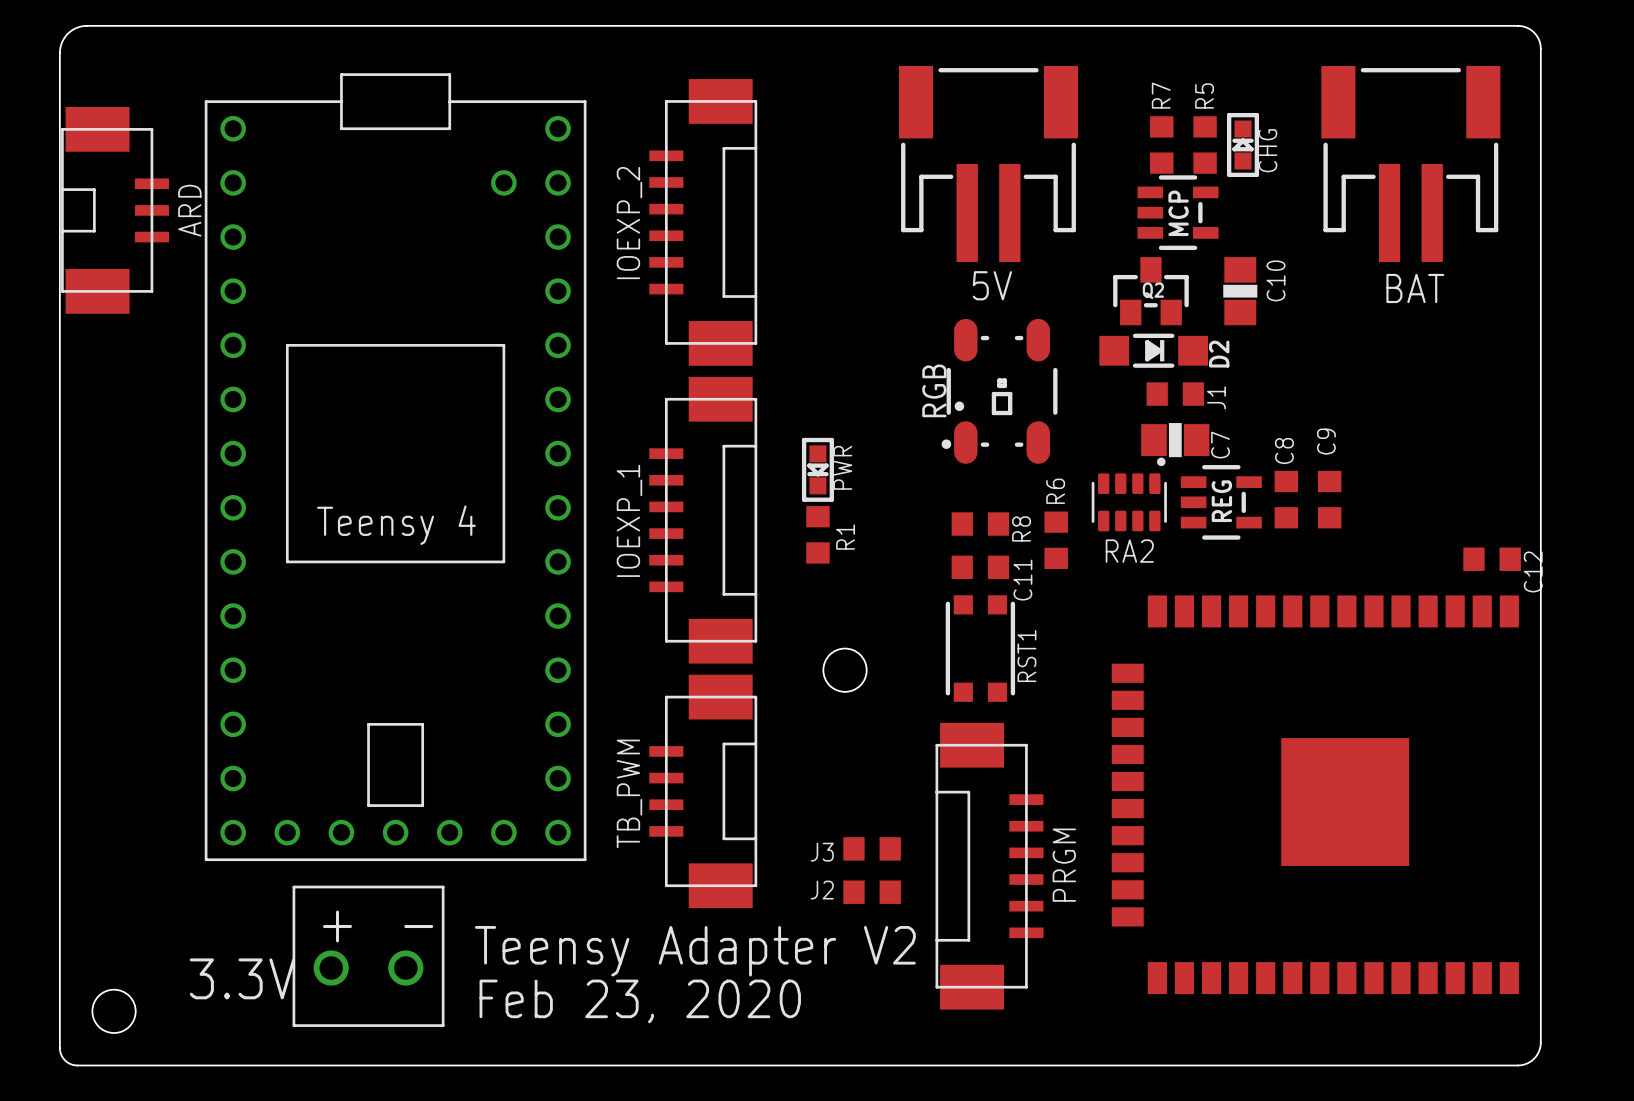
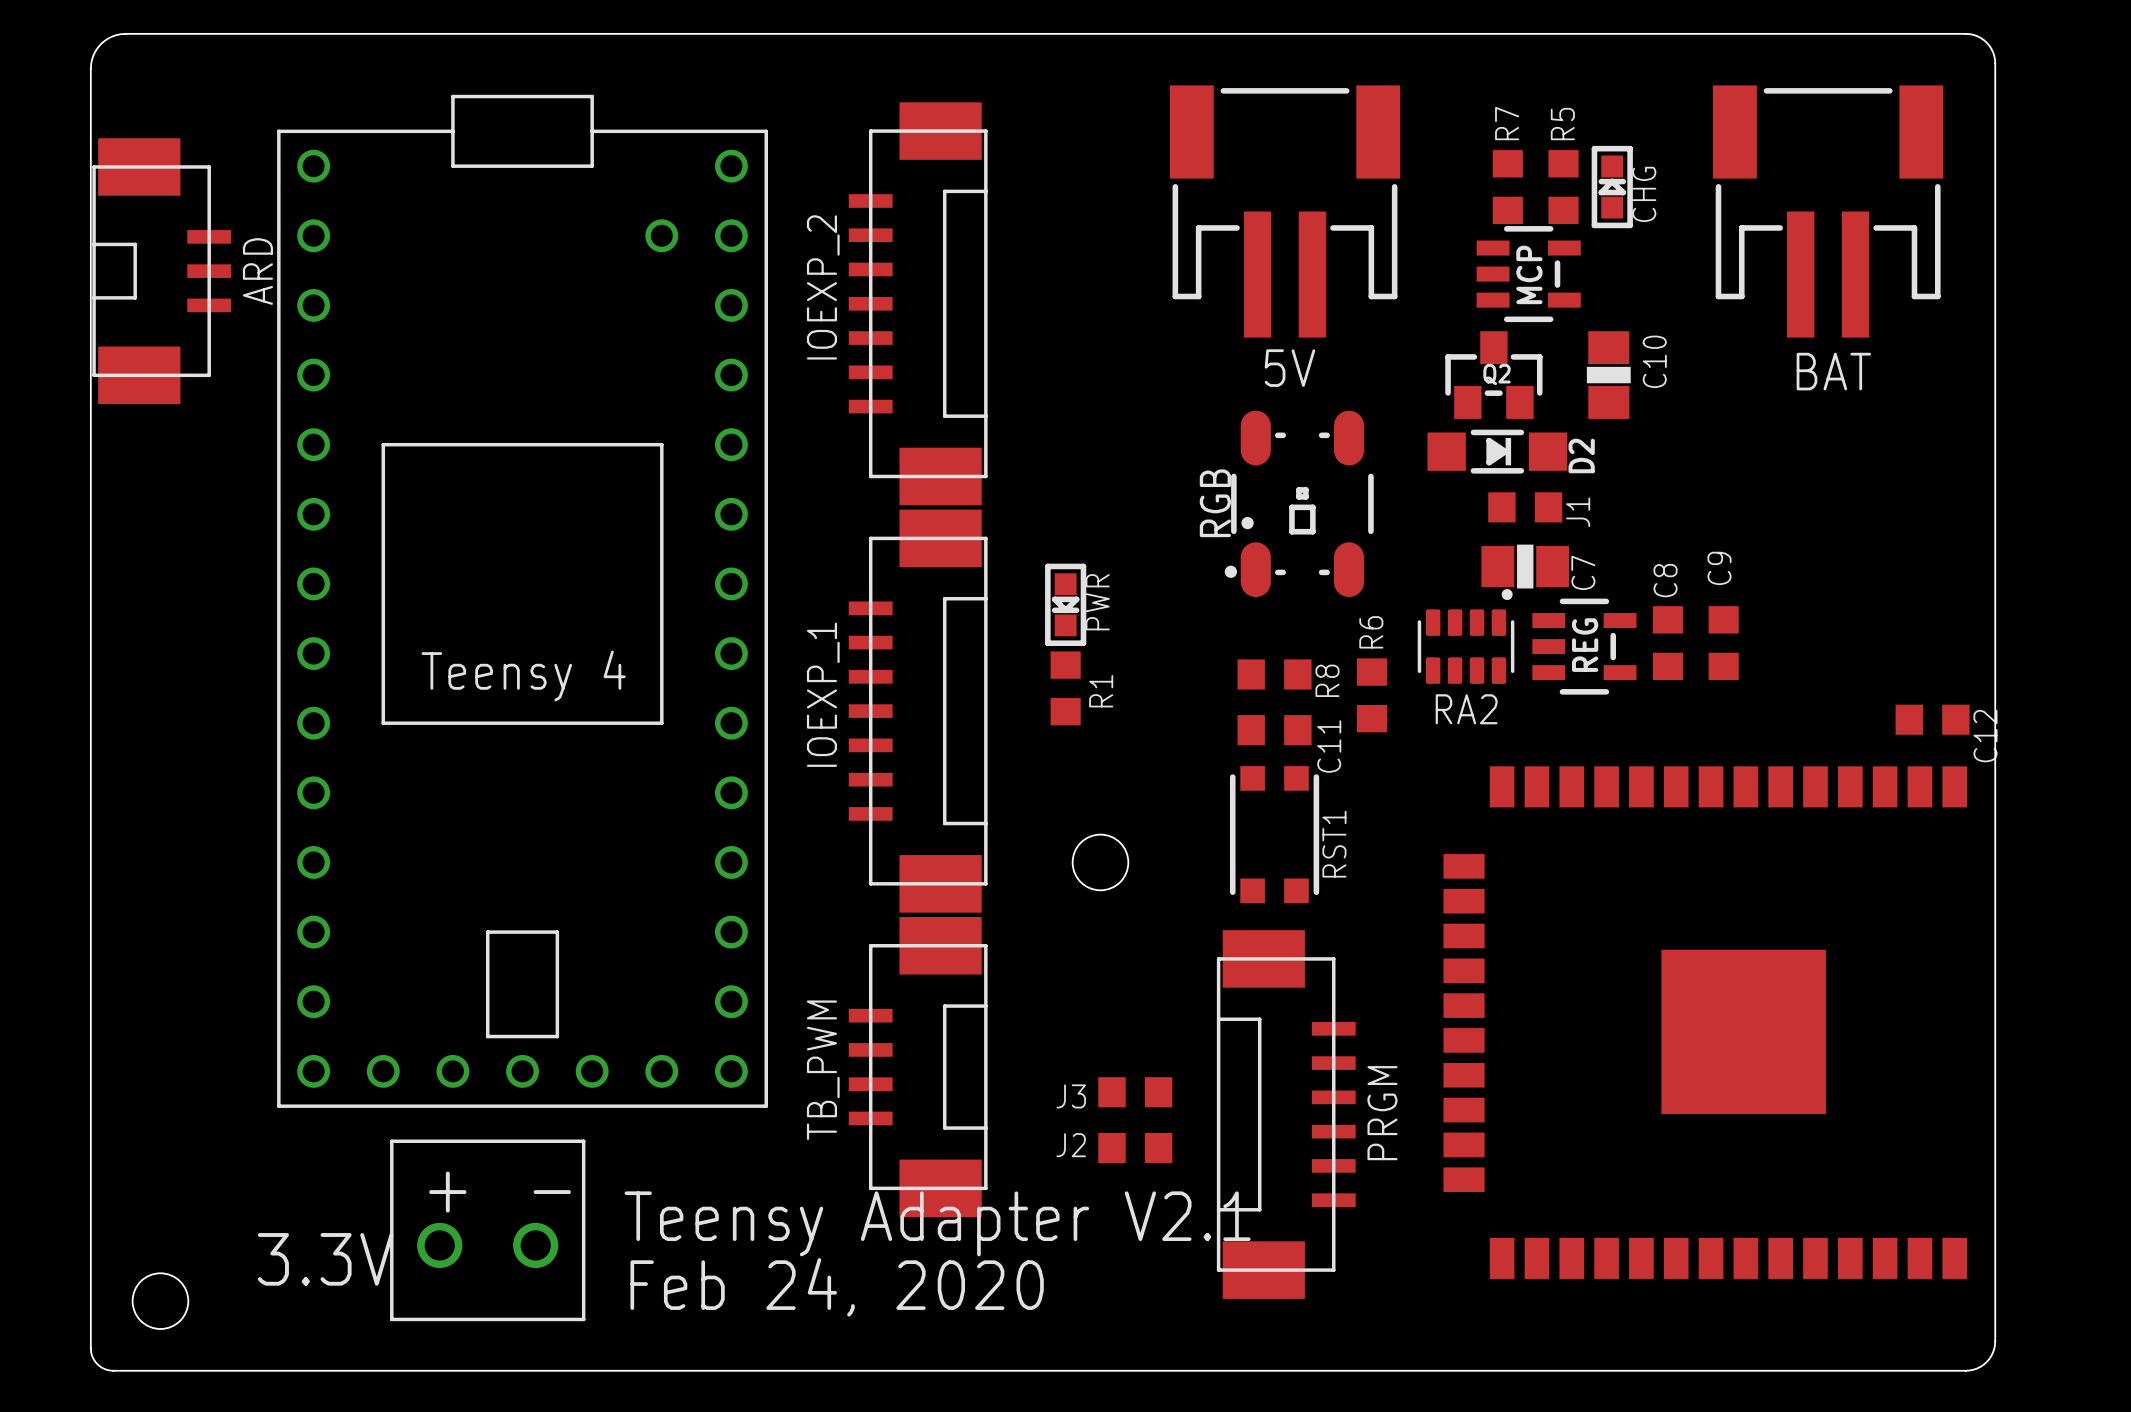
IOEXP_2 footprint: [649, 79, 758, 366] -> [848, 102, 988, 506]
IOEXP_1 footprint: [649, 376, 758, 664] -> [848, 509, 988, 913]
TB_PWM position: (703, 791) -> (918, 1067)
text: Teensy Adapter V2 (695, 951) -> Teensy Adapter V2.1 (937, 1223)
text: Feb 23, 2020 (640, 1001) -> Feb 24, 2020 (837, 1287)

